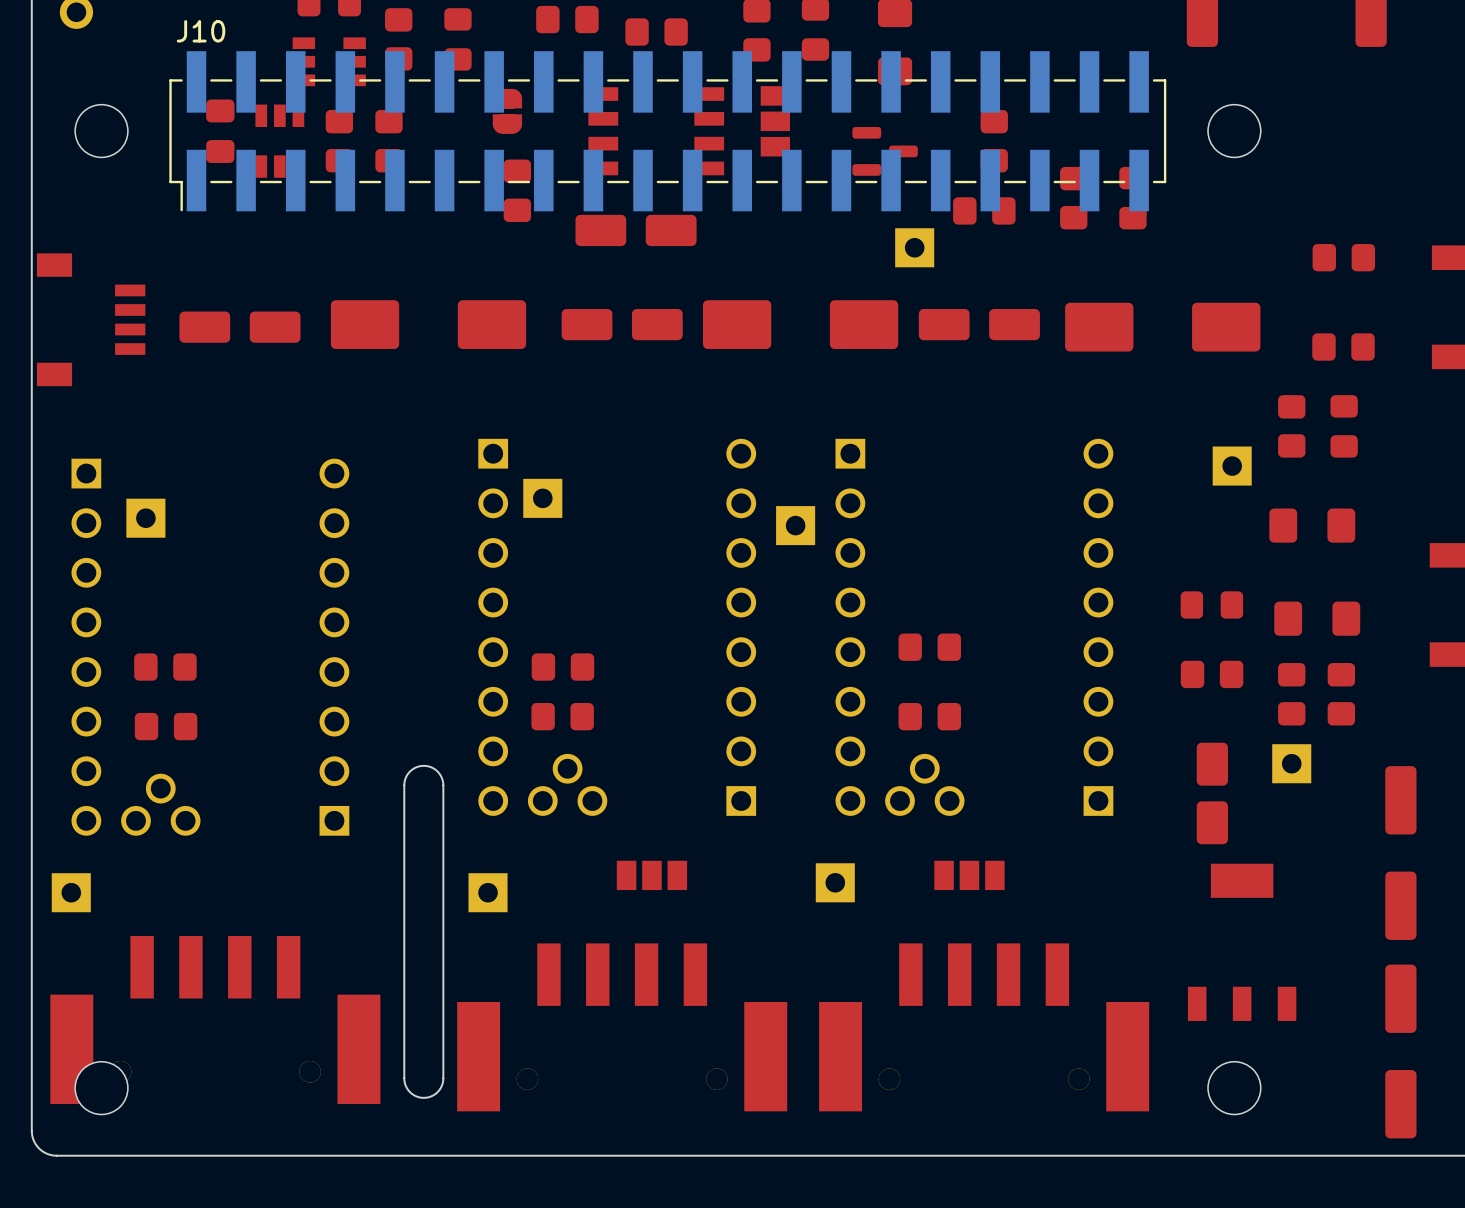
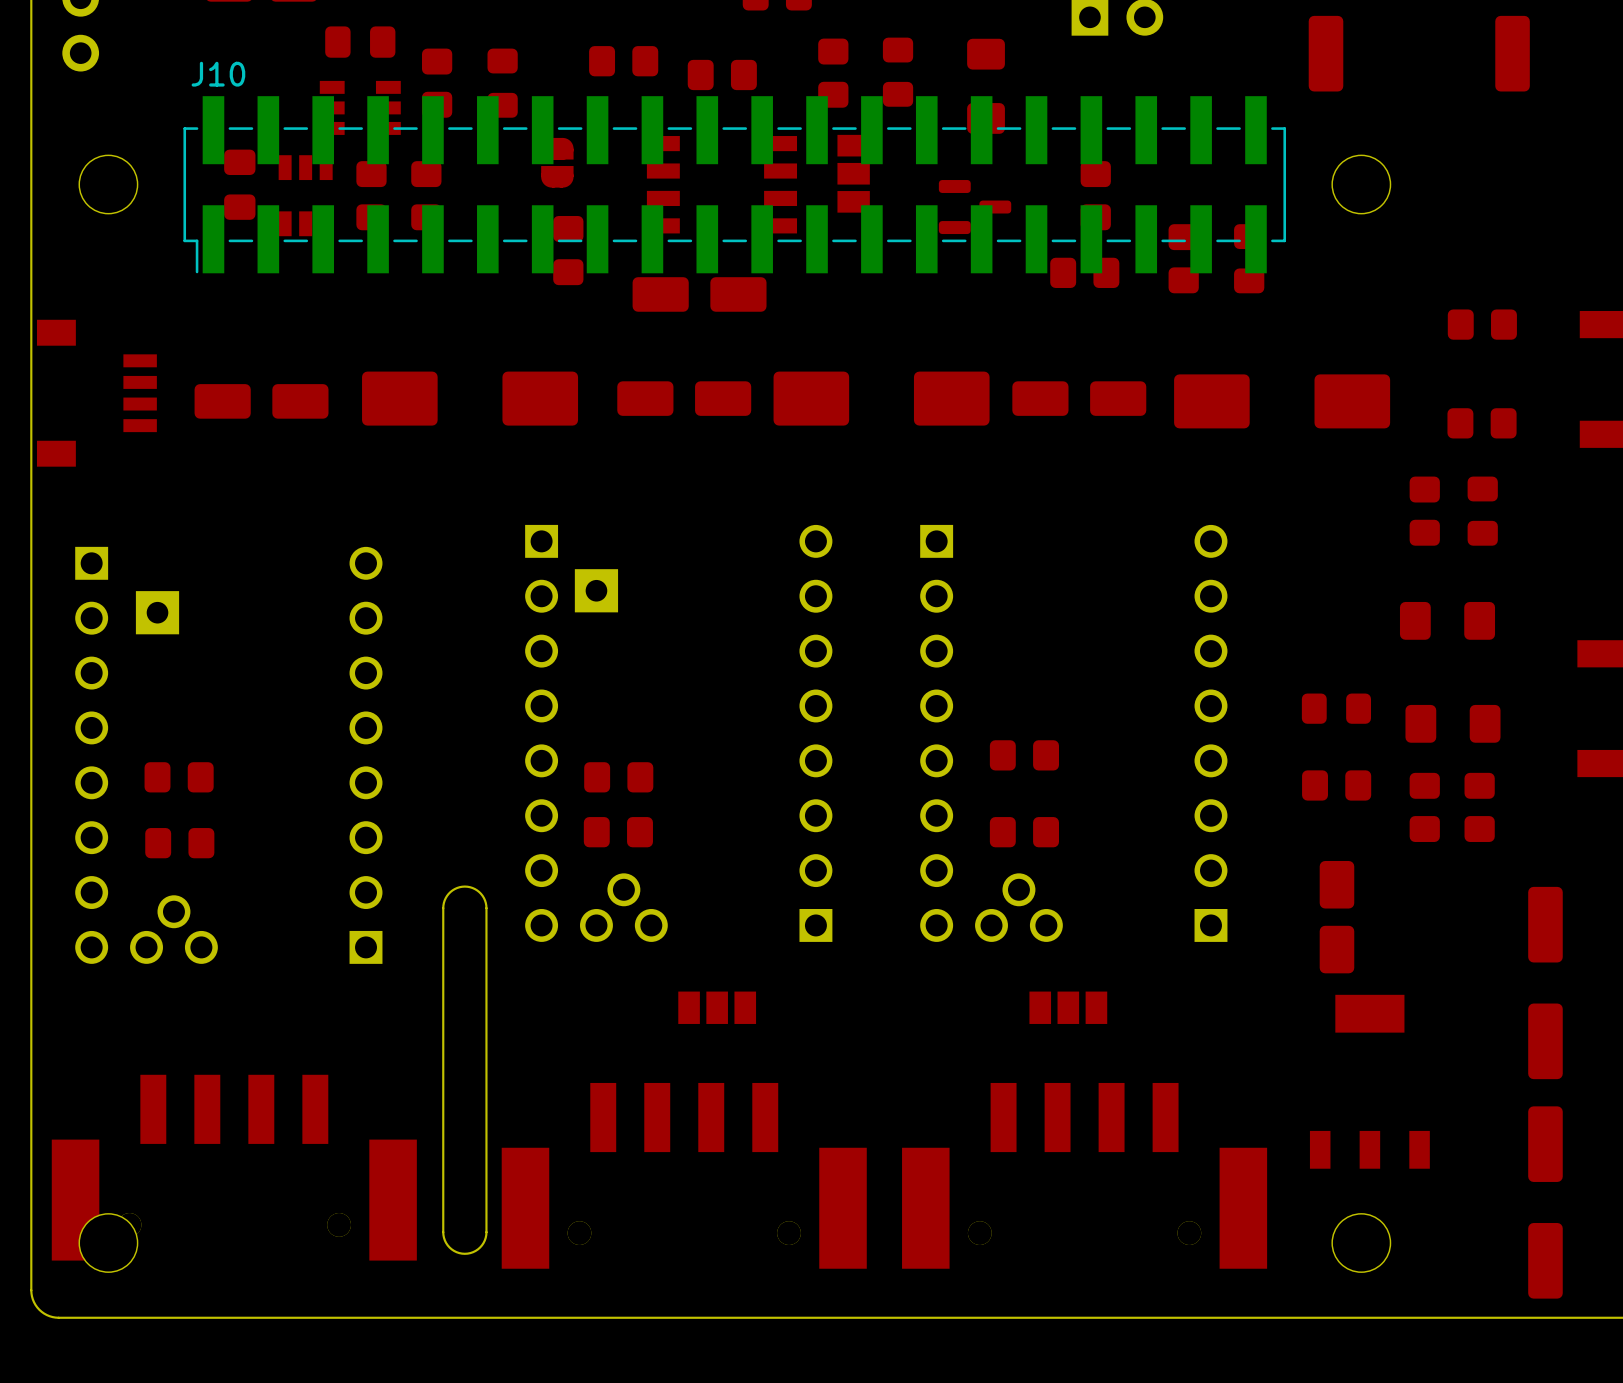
part: (914, 247) -> none
part: (1232, 466) -> none
part: (795, 525) -> none
part: (1291, 763) -> none
part: (835, 882) -> none
part: (71, 892) -> none
part: (488, 892) -> none

